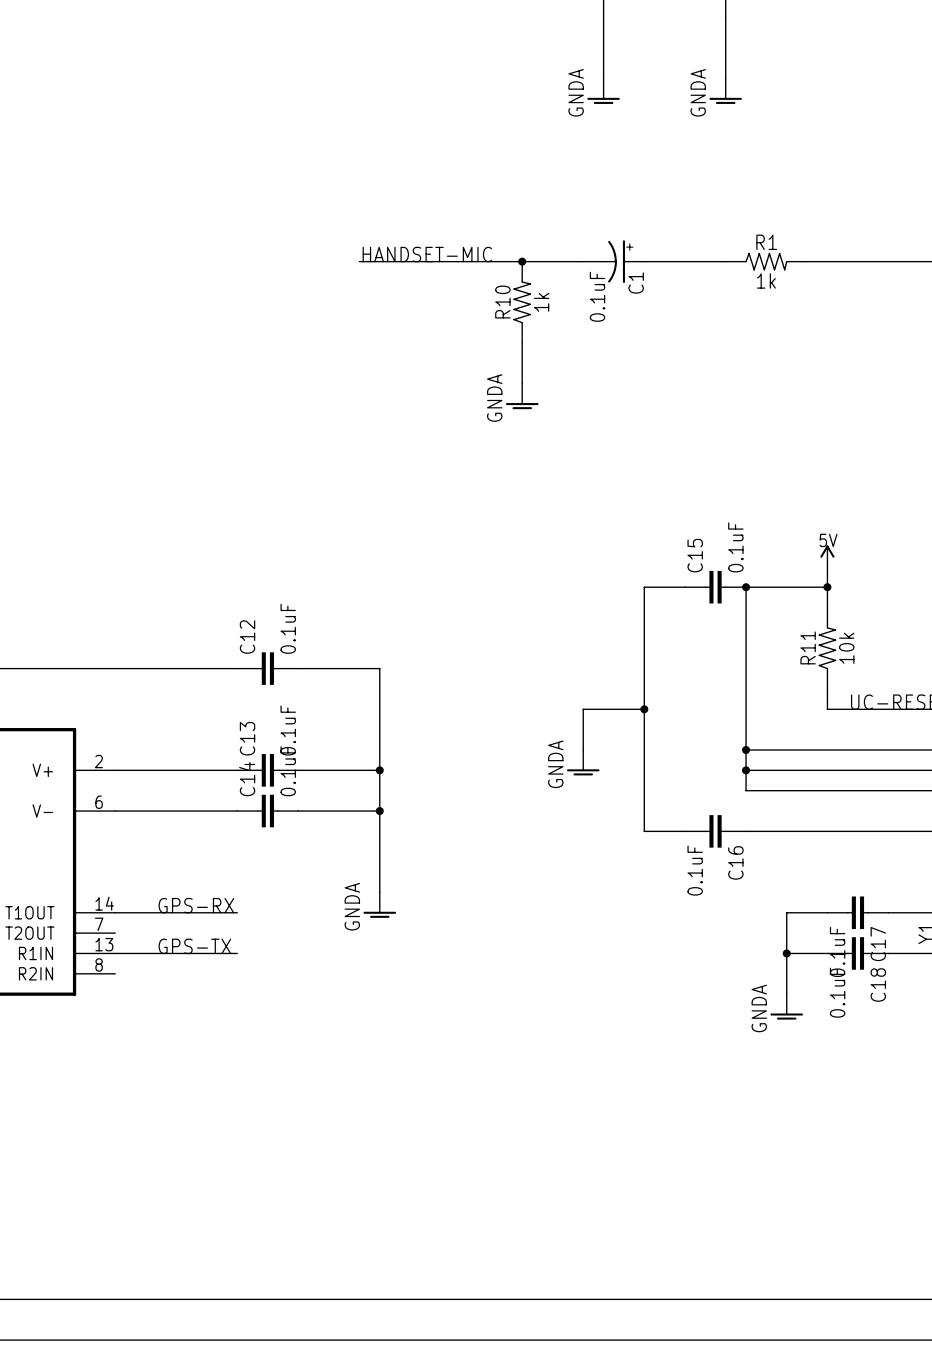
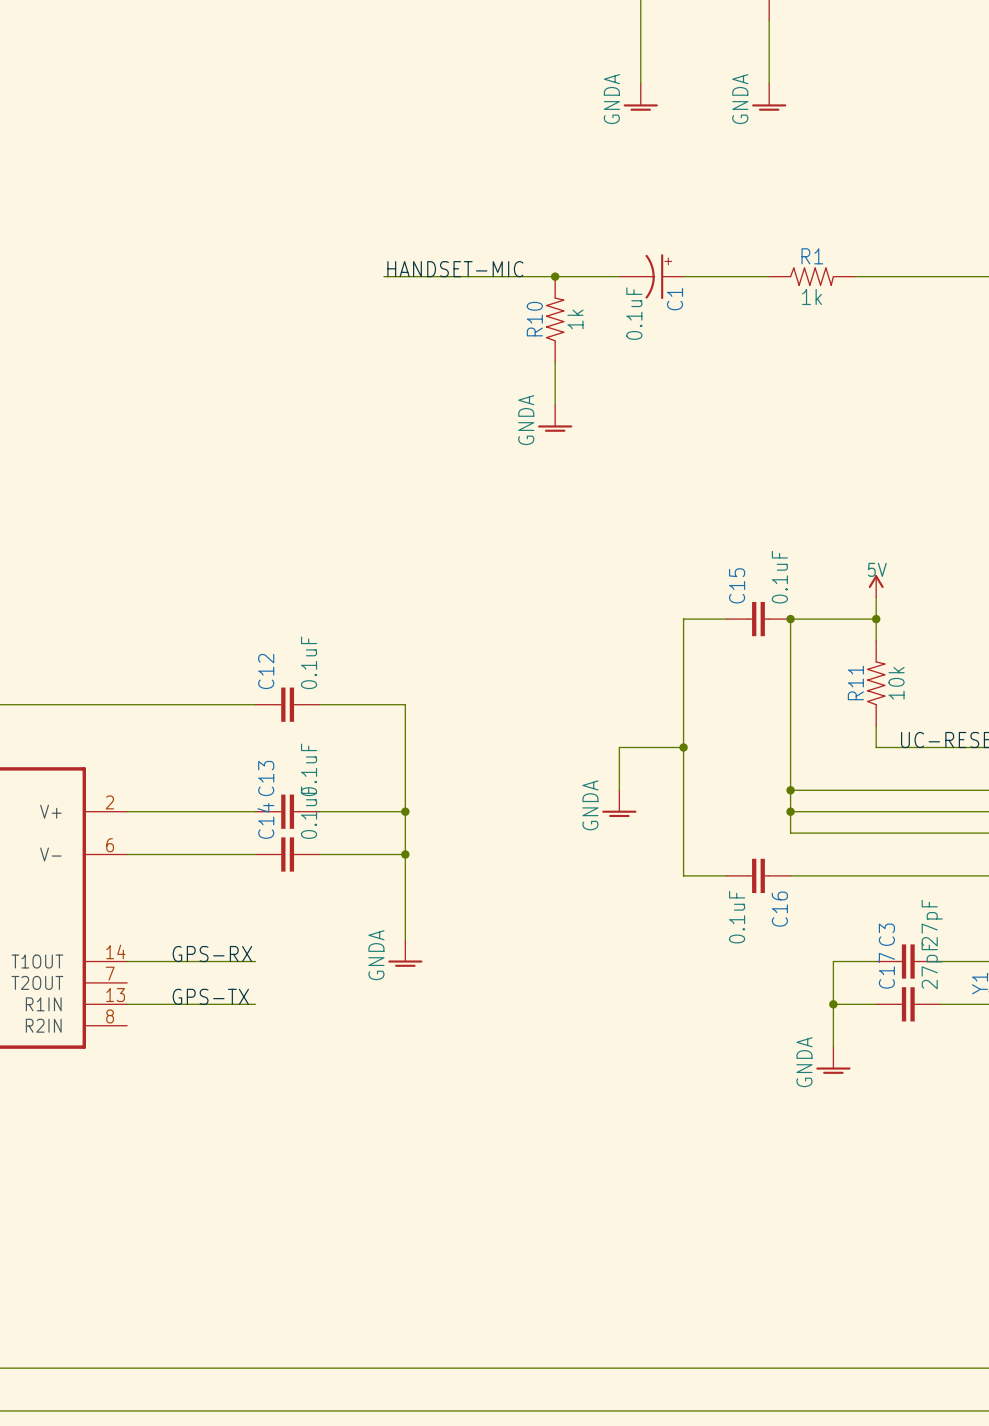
C17 name: C17 (878, 944) -> C3 (886, 934)
C17 value: 0.1uF (837, 951) -> 27pF (932, 923)
C18 name: C18 (878, 985) -> C17 (886, 970)
C18 value: 0.1uF (837, 992) -> 27pF (932, 965)

